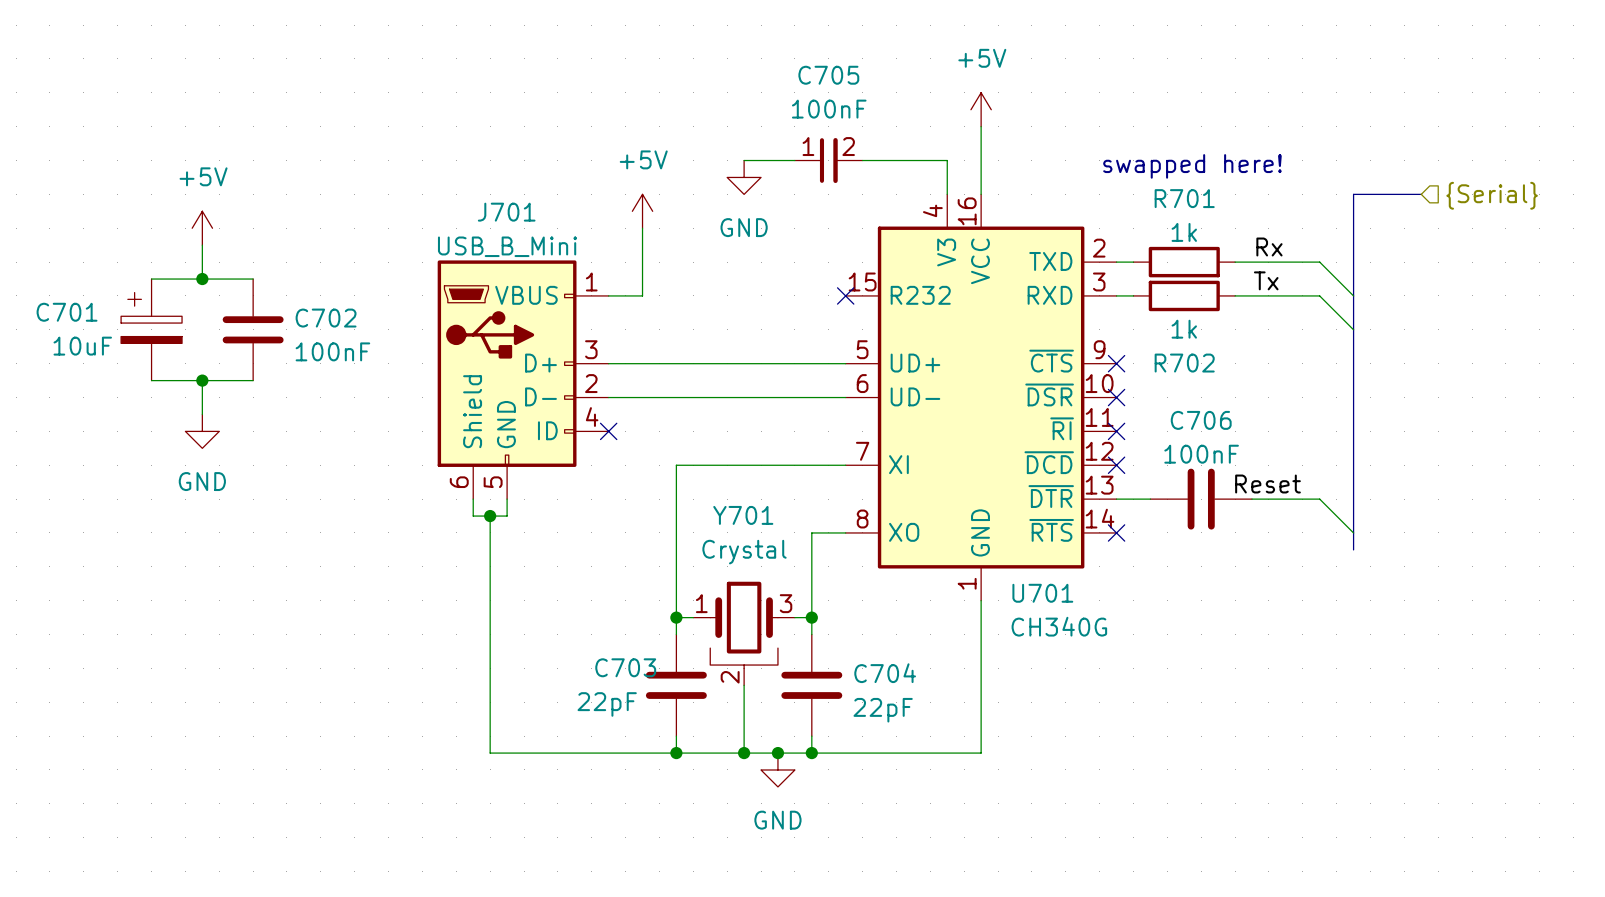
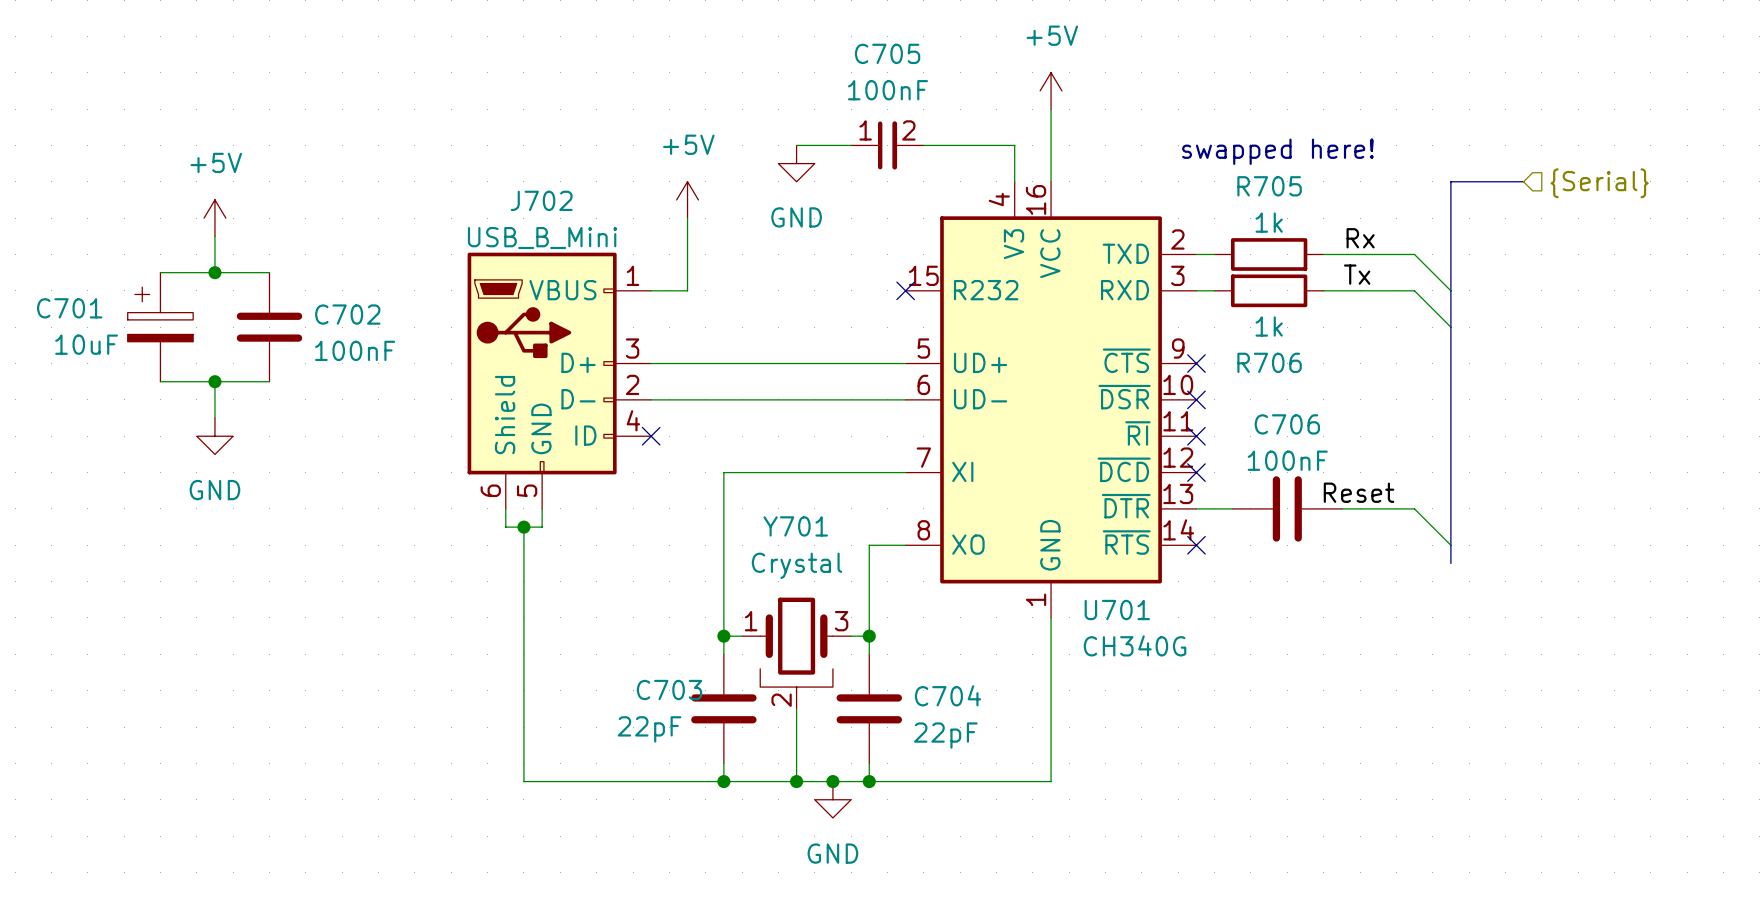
R701 name: R701 (1184, 198) -> R705 (1269, 186)
J701 name: J701 (506, 212) -> J702 (541, 200)
R702 name: R702 (1184, 363) -> R706 (1269, 362)

